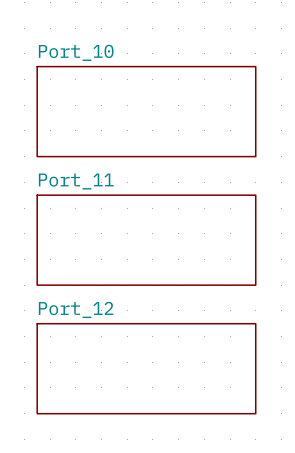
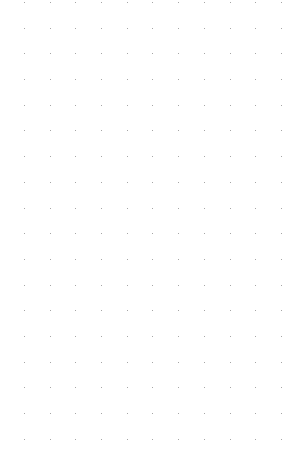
sheet Port_10: (146, 111) -> none
sheet Port_11: (146, 240) -> none
sheet Port_12: (146, 368) -> none

